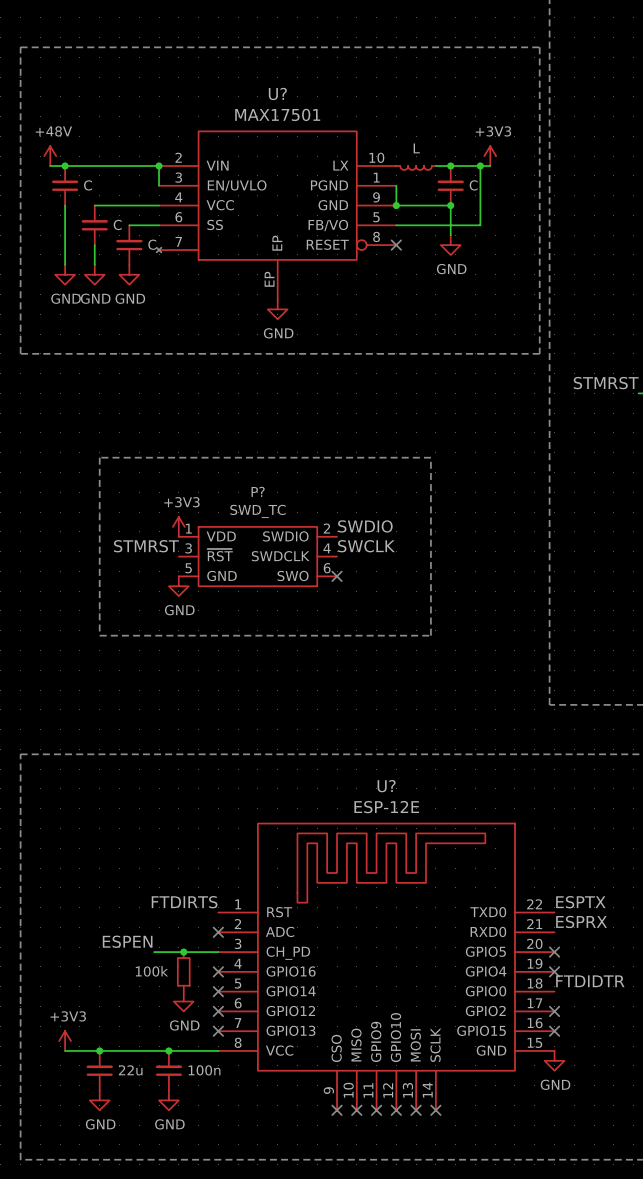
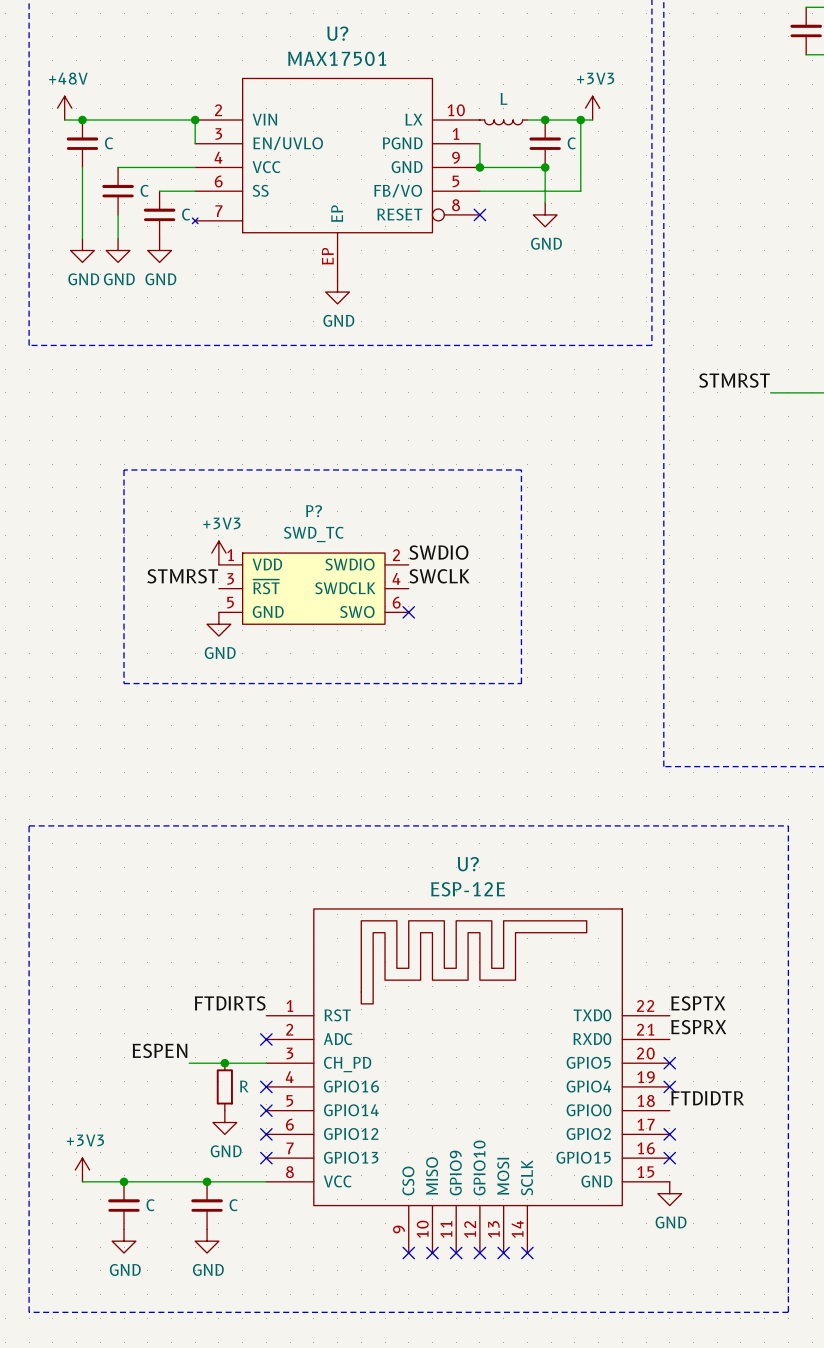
part value: 100k (151, 971) -> R (244, 1086)
part value: 22u (130, 1070) -> C (150, 1205)
part value: 100n (204, 1070) -> C (233, 1205)

